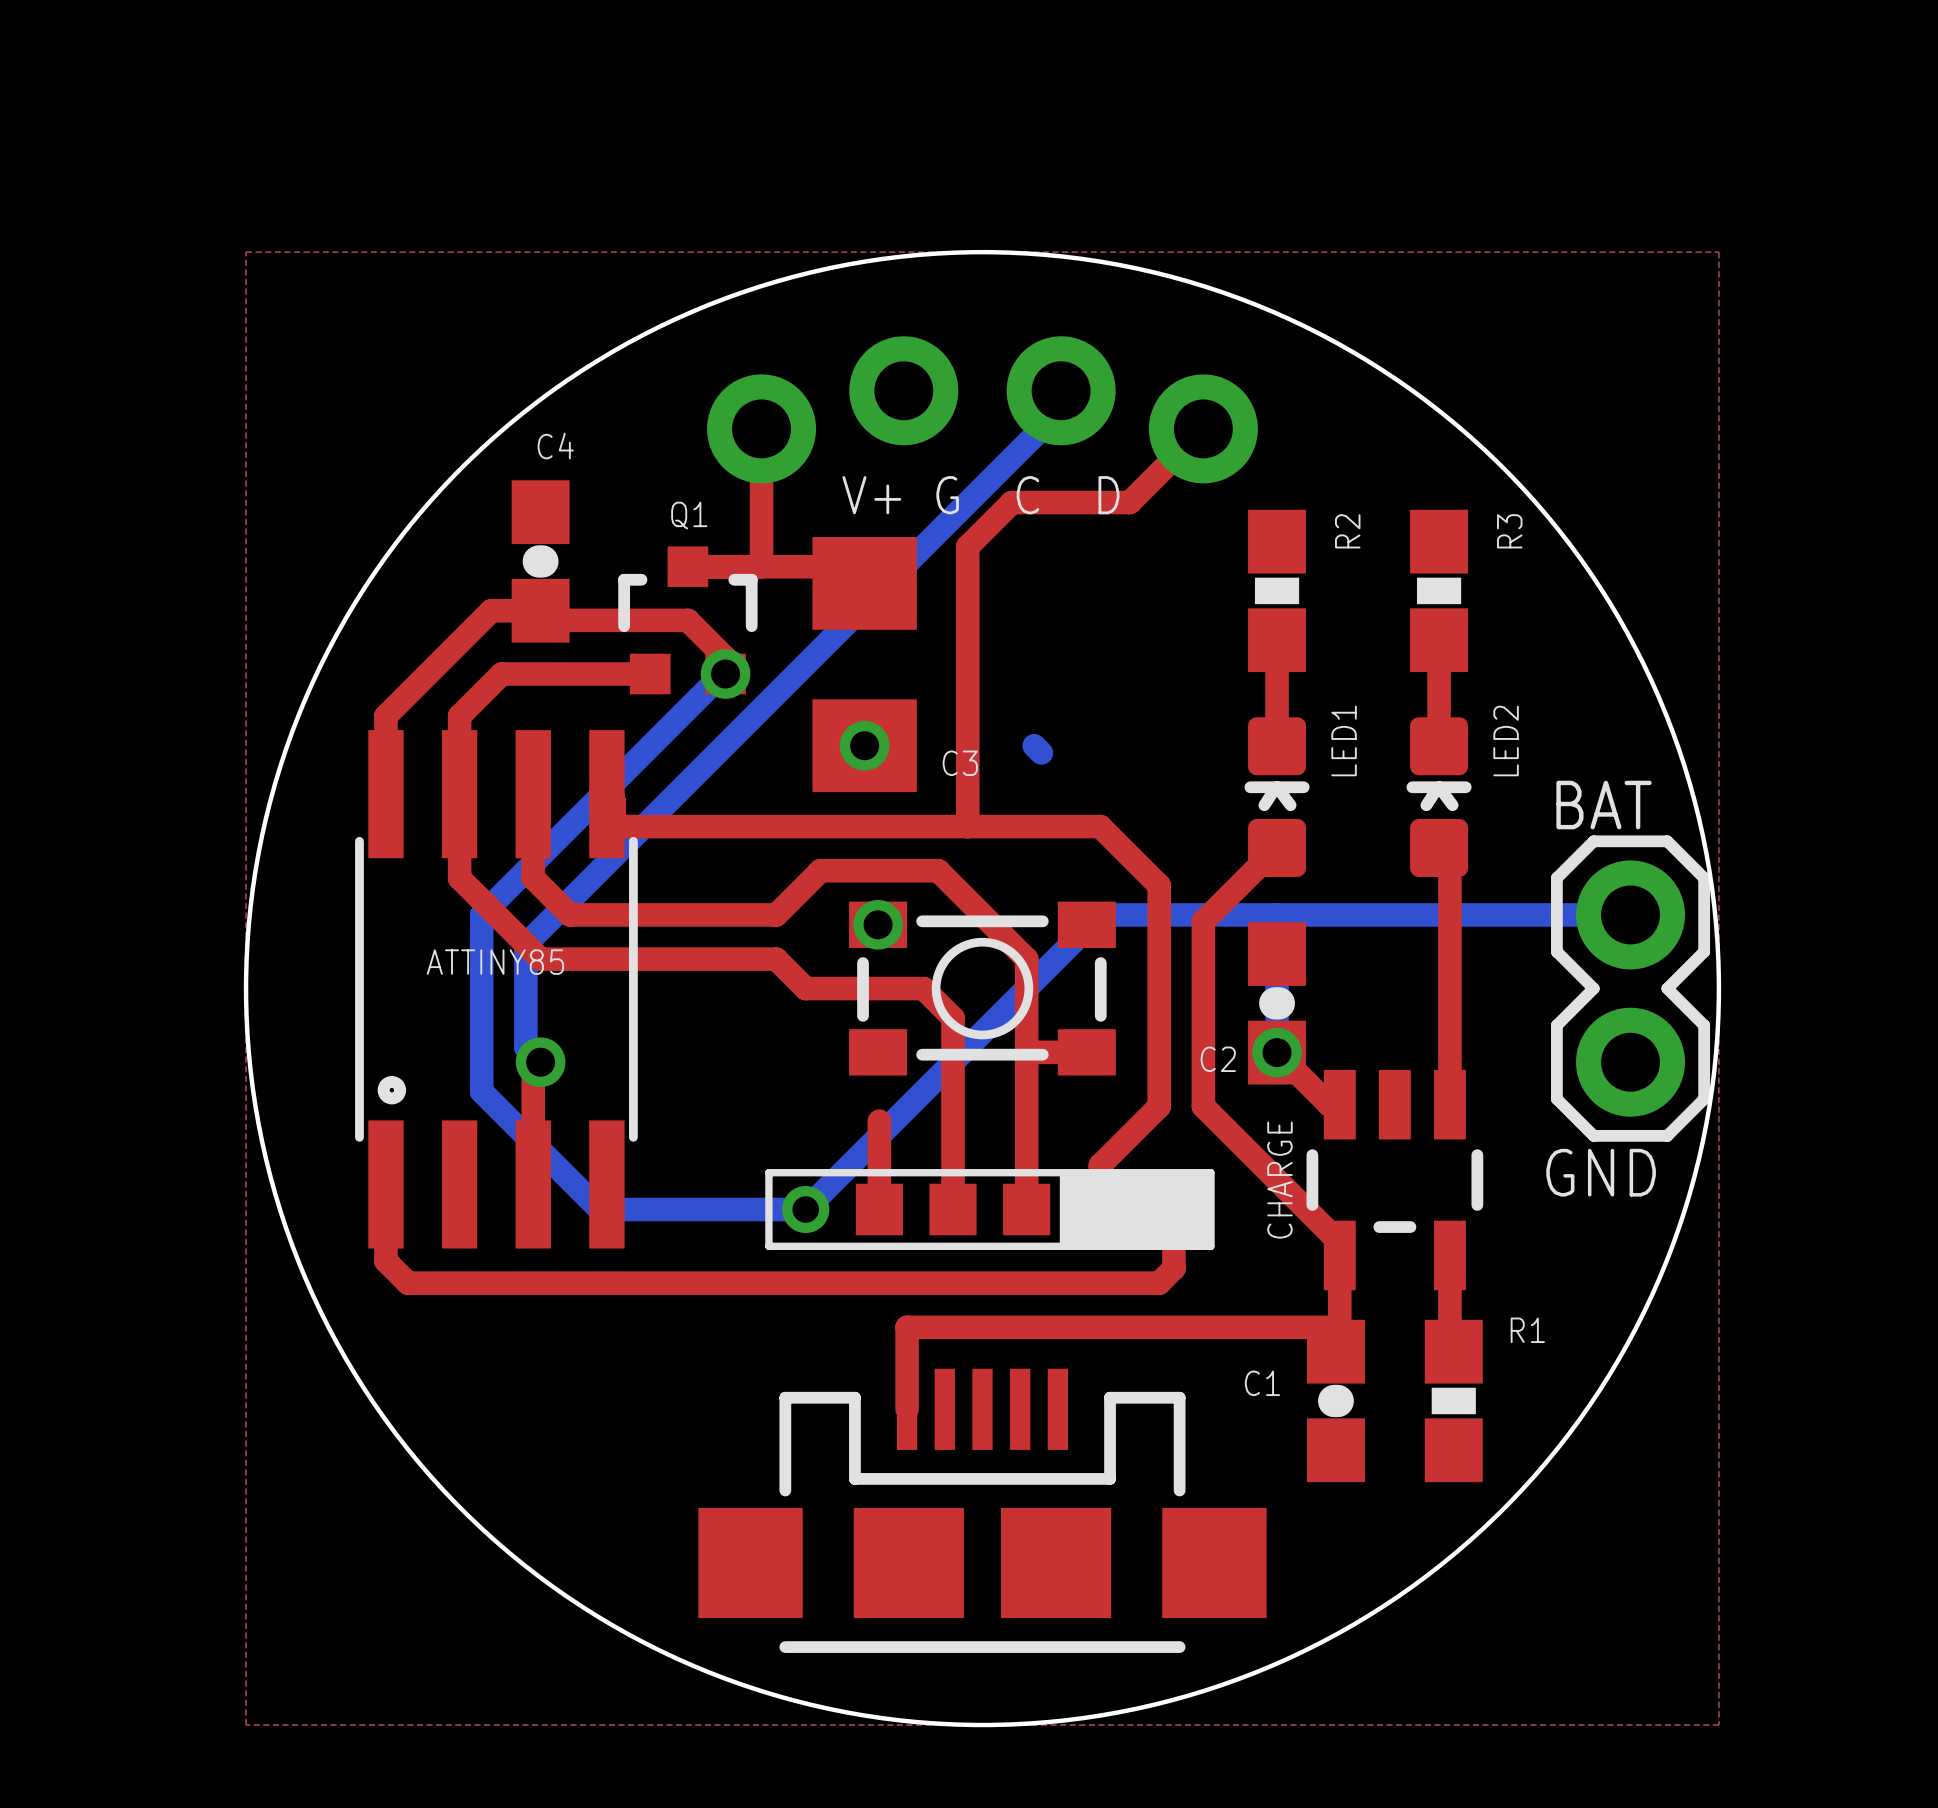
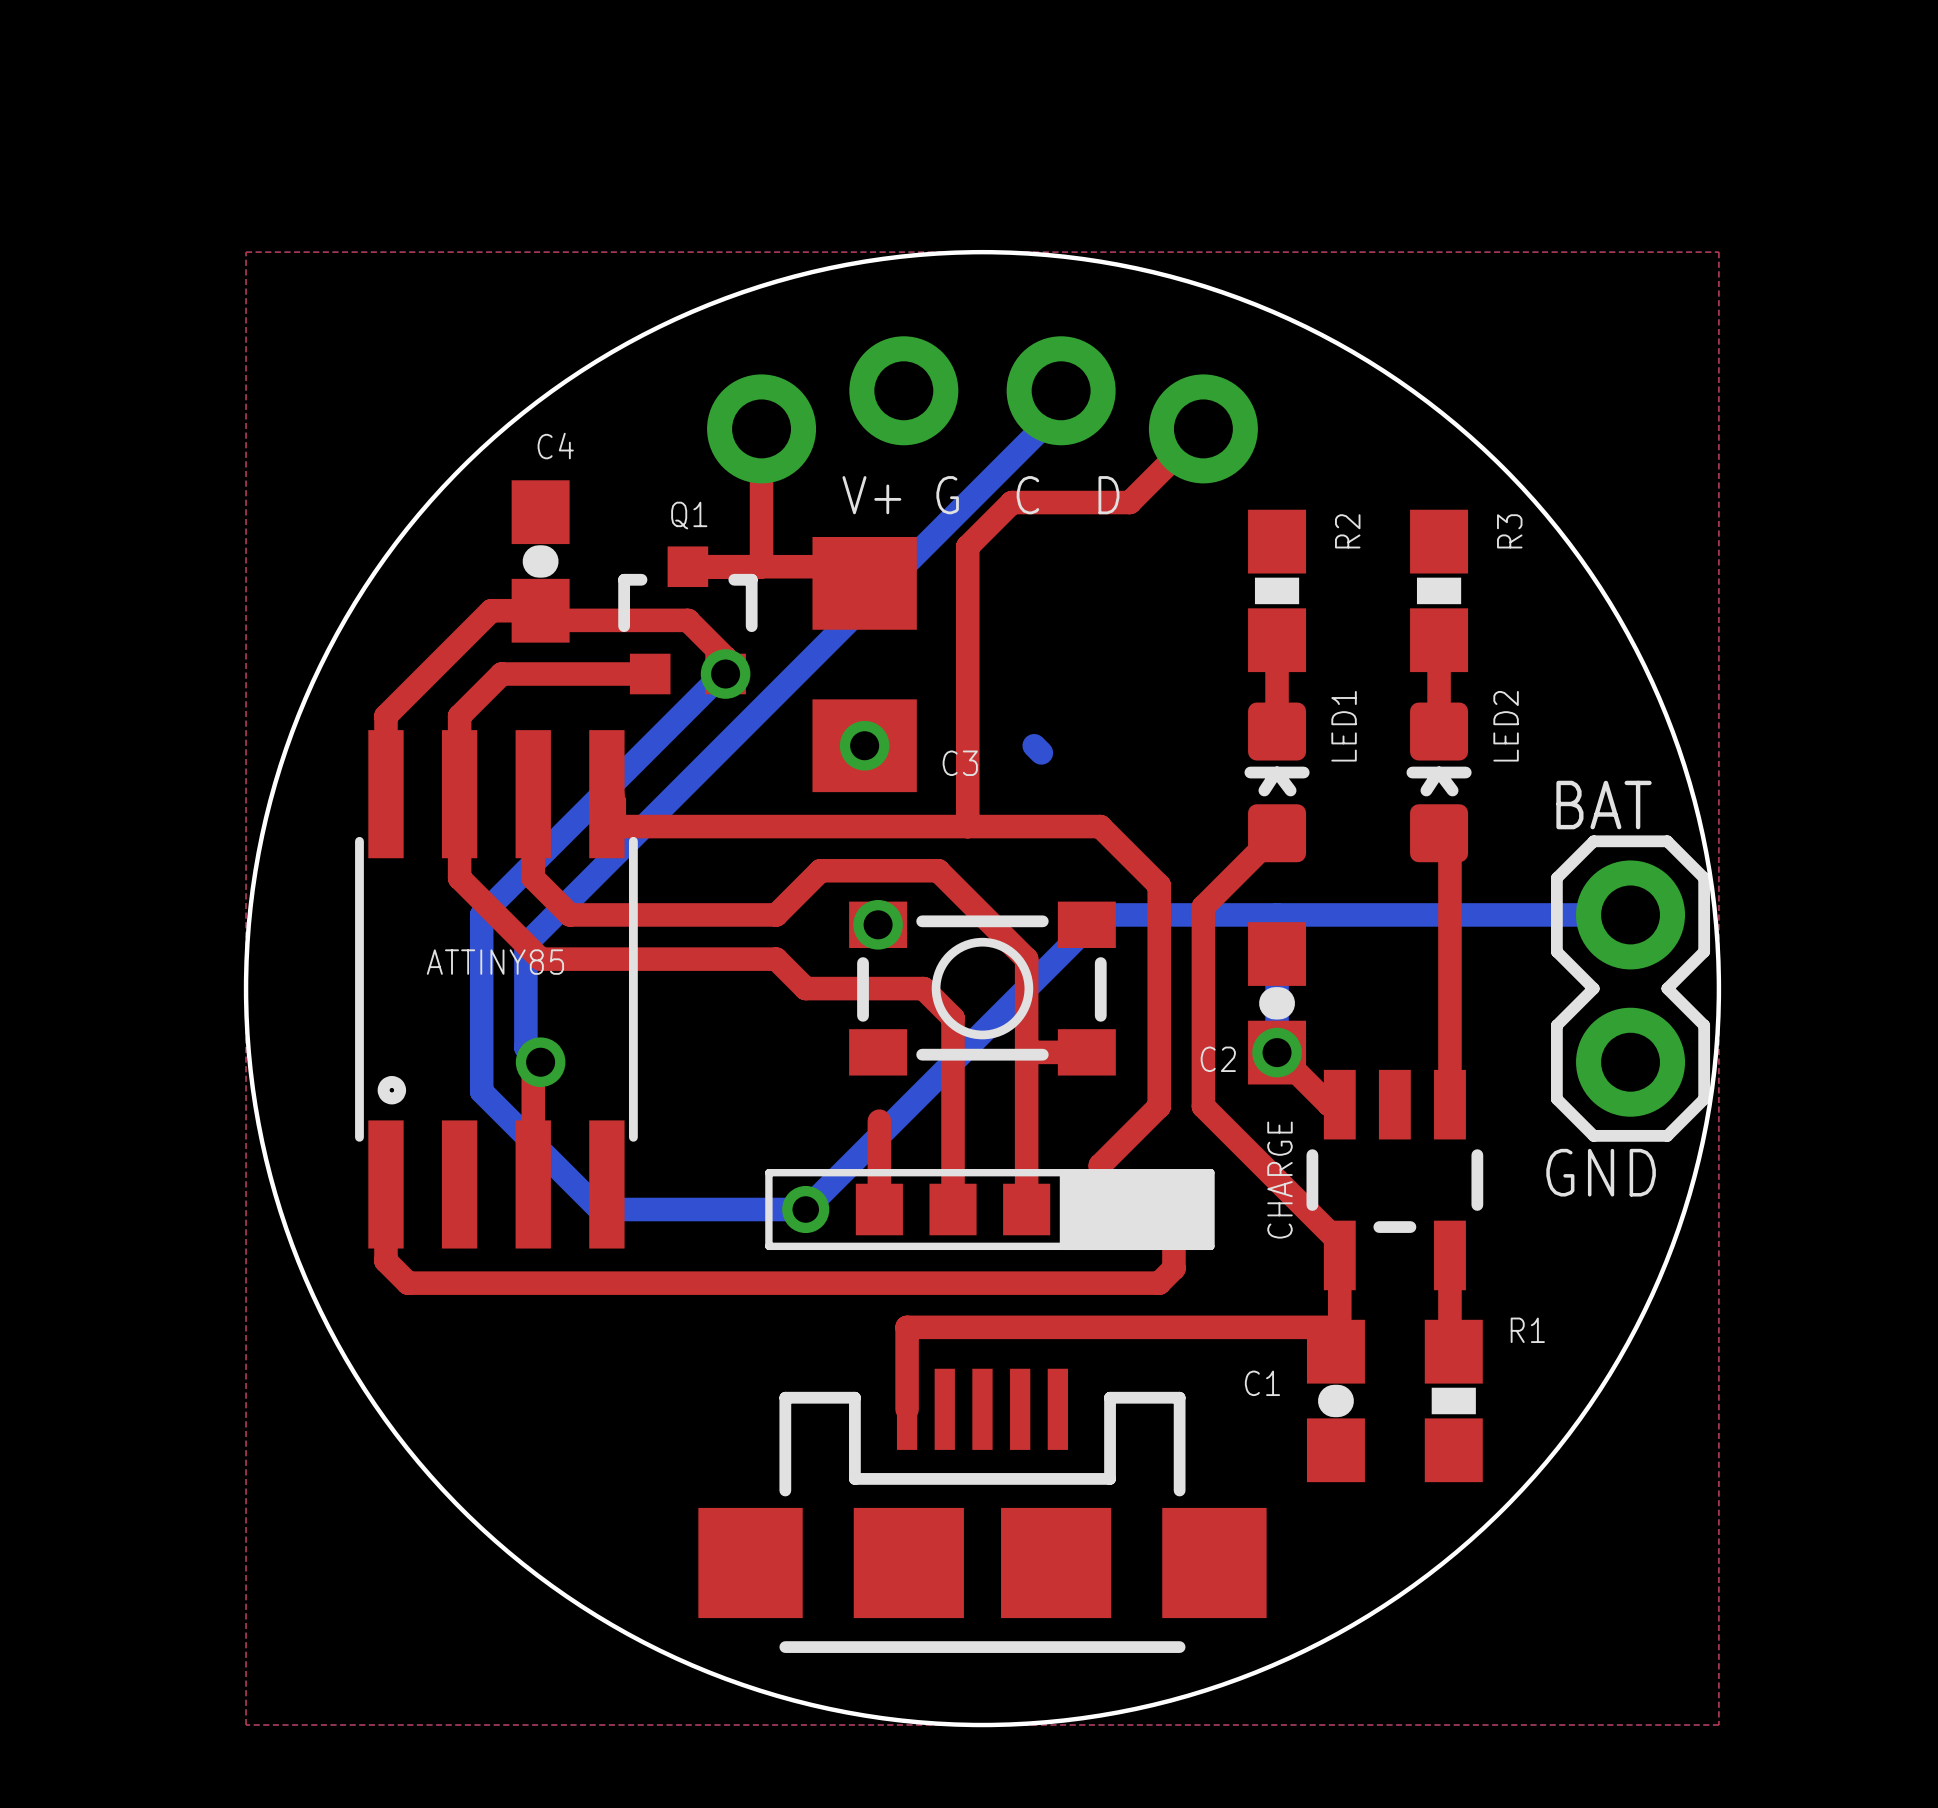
LED1 position: (1277, 797) -> (1277, 782)
LED2 position: (1439, 797) -> (1439, 782)
top track: (1277, 847) (1203, 921) -> (1277, 833) (1203, 906) (1203, 921)

